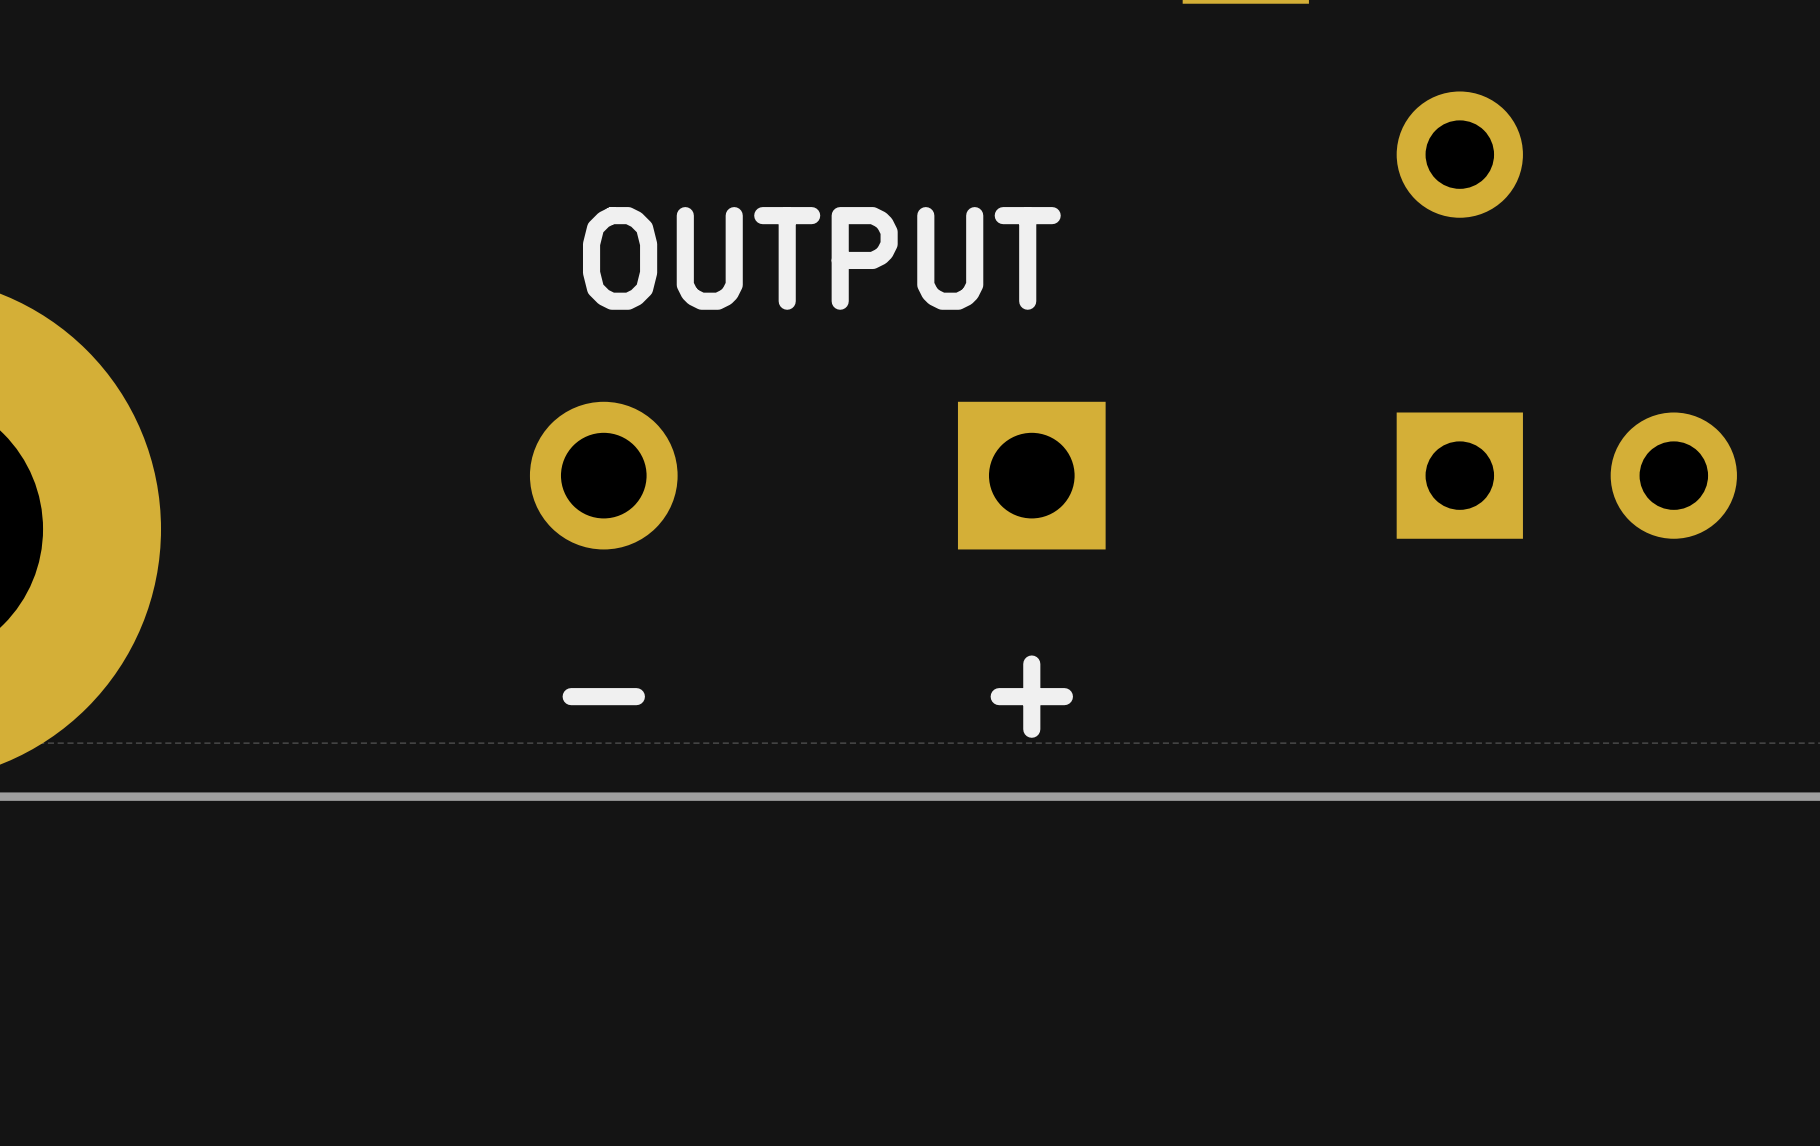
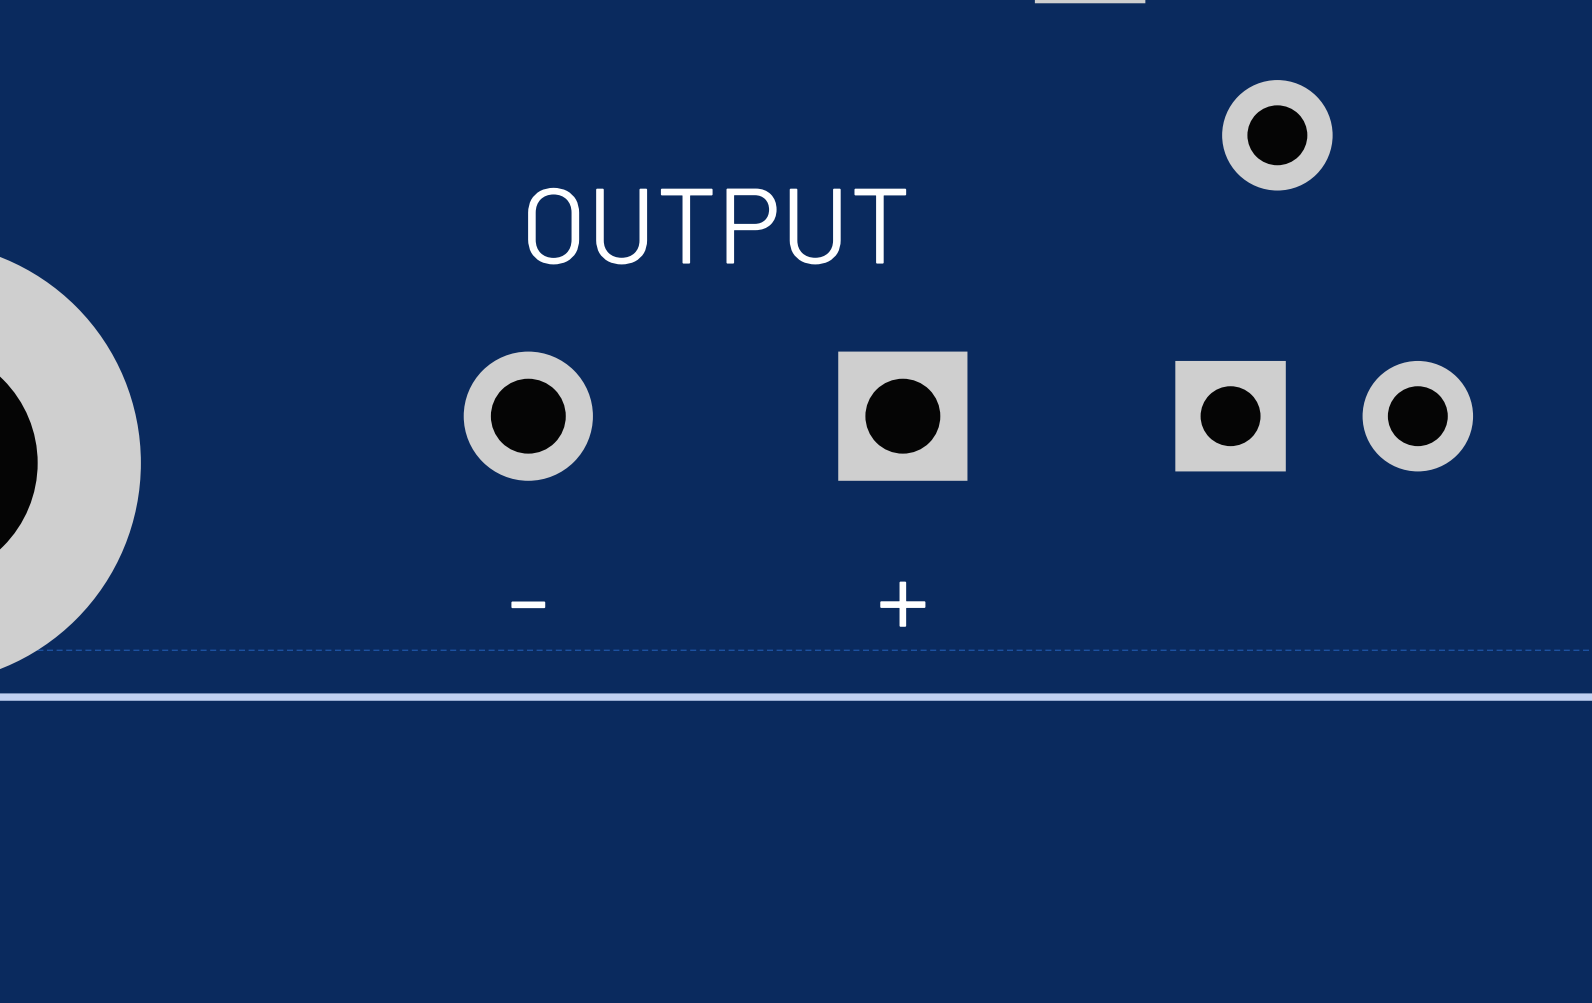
part position: (1566, 475) -> (1324, 416)

